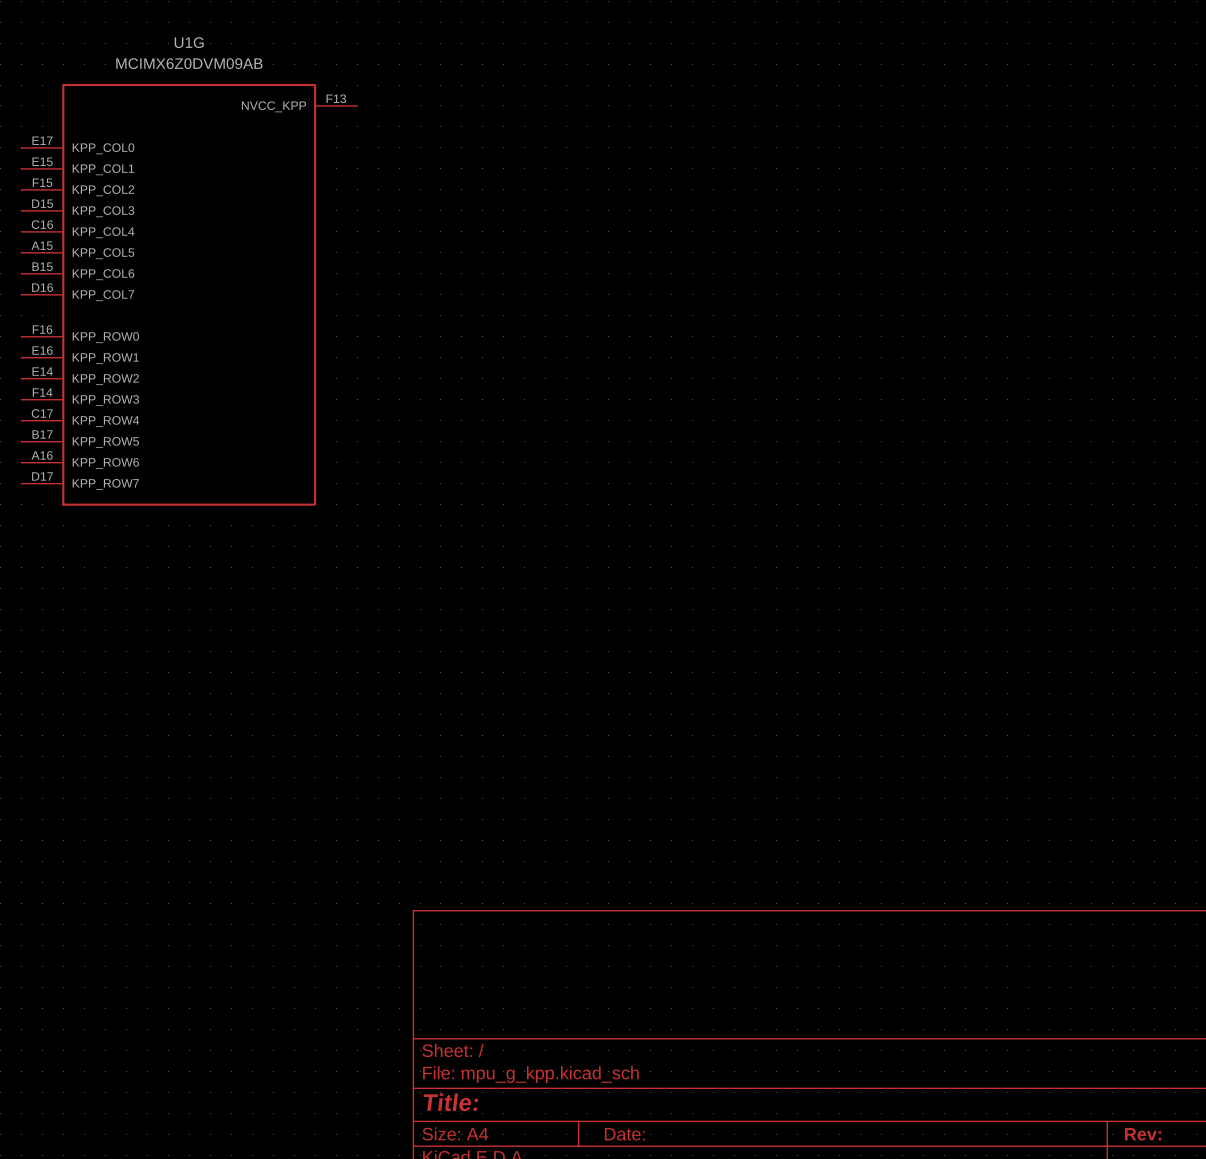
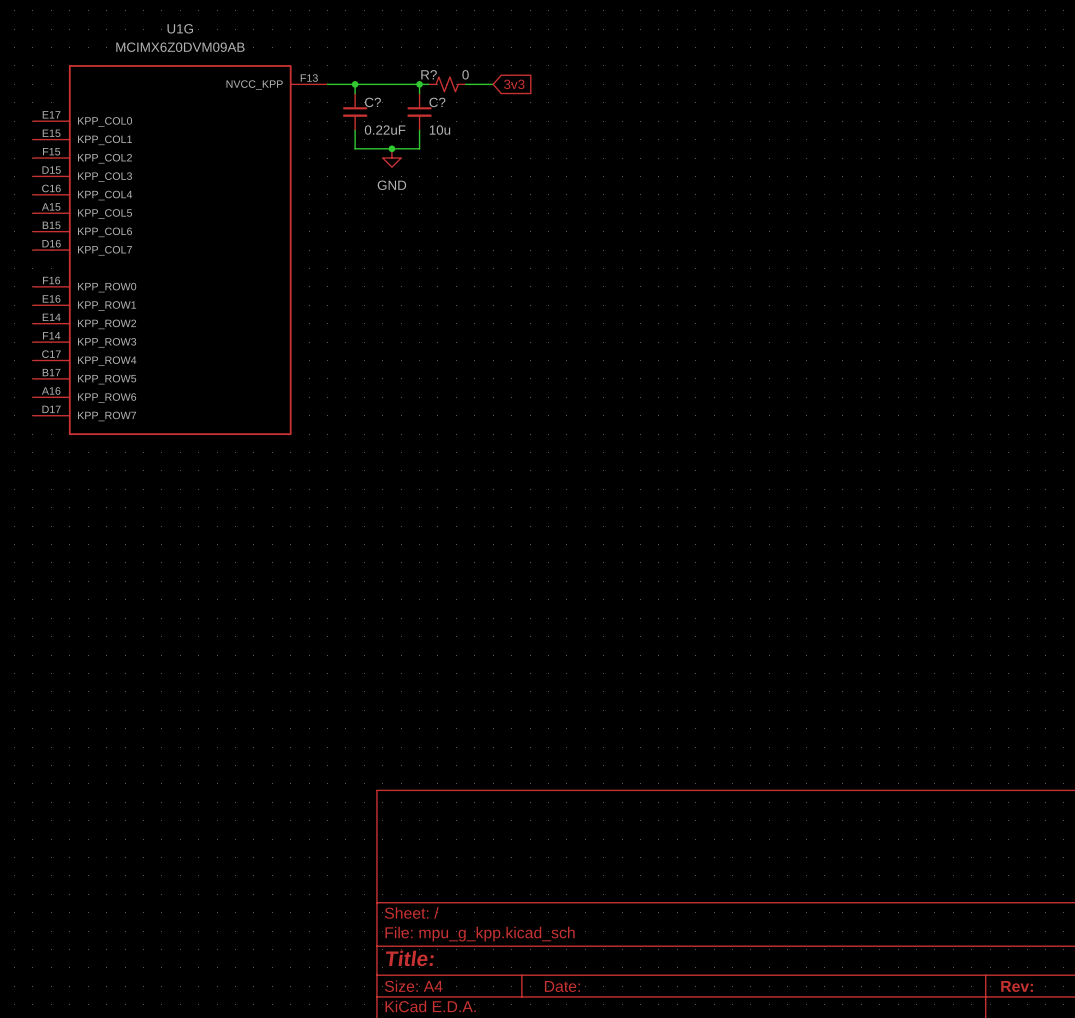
wire: none -> (327, 84) (428, 84)
wire: none -> (355, 84) (355, 93)
junction: none -> (355, 84)
wire: none -> (419, 84) (419, 93)
junction: none -> (419, 84)
R?: none -> 0 (447, 84)
wire: none -> (465, 84) (493, 84)
global label: none -> 3v3 (514, 84)
C?: none -> 0.22uF (355, 111)
C?: none -> 10u (419, 111)
wire: none -> (355, 130) (355, 148) (419, 148) (419, 130)
junction: none -> (391, 148)
power symbol: none -> GND (391, 158)

